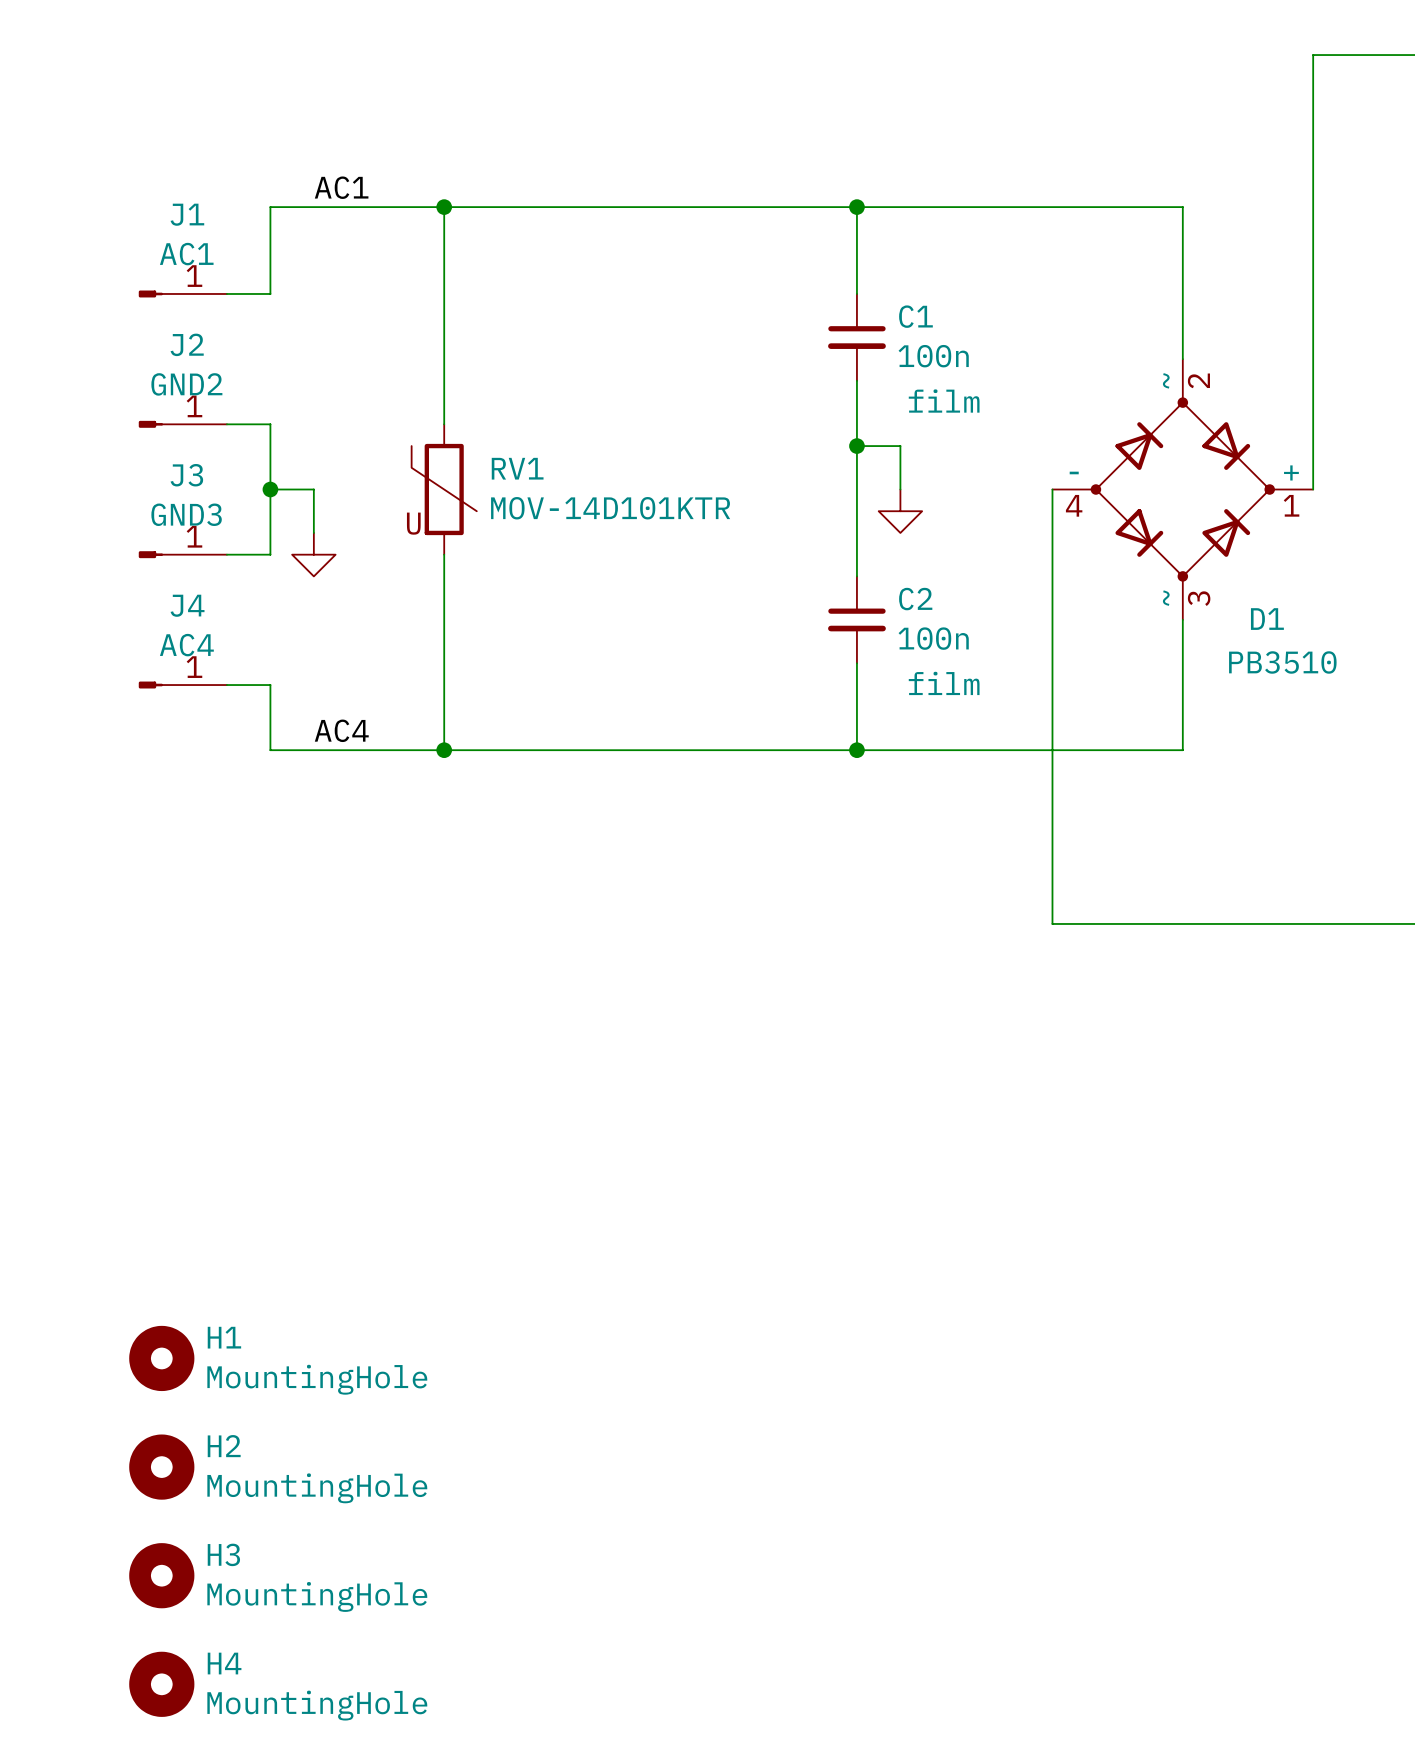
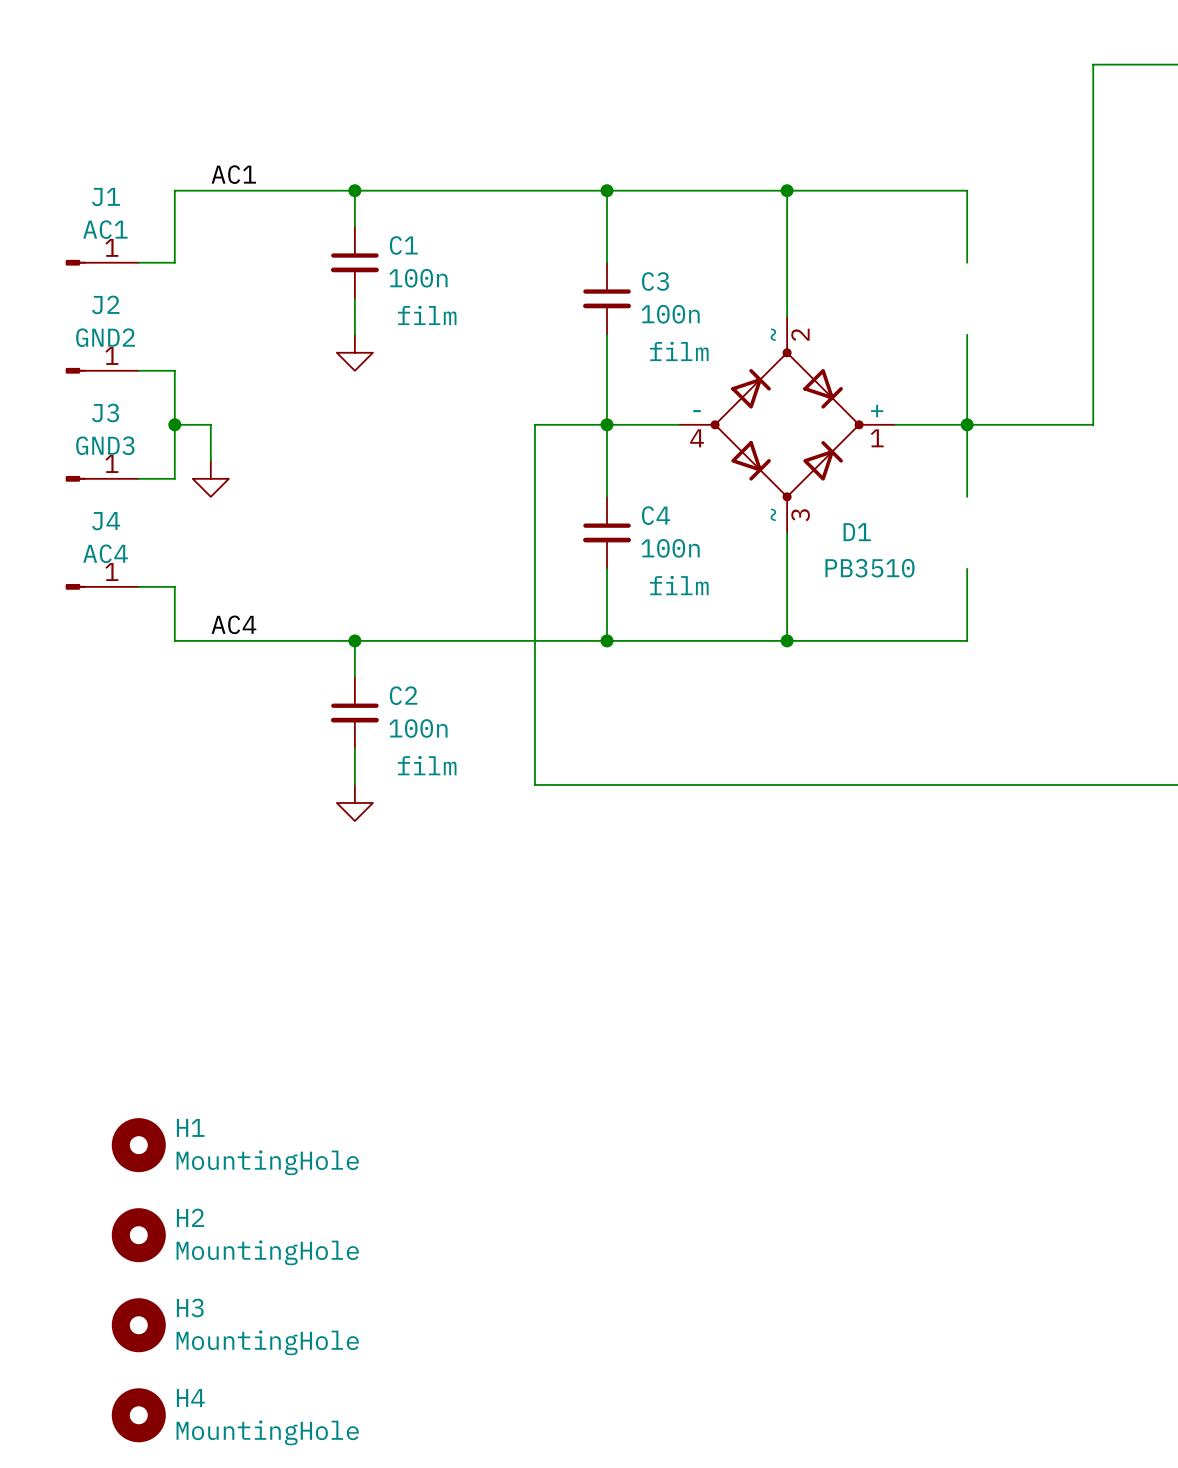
label position: AC1 (341, 187) -> AC1 (233, 174)
wire: (270, 207) (270, 293) (226, 293) -> (228, 190) (174, 190) (174, 262) (138, 262)
wire: none -> (354, 190) (354, 226)
wire: (444, 207) (444, 424) -> none
junction position: (444, 207) -> (354, 190)
junction: none -> (607, 190)
wire: (856, 207) (856, 293) -> (607, 190) (607, 262)
junction: (856, 207) -> none
wire: none -> (787, 190) (787, 316)
junction: none -> (787, 190)
wire: (1161, 207) (1182, 207) (1182, 359) -> (967, 190) (967, 262)
J1 position: (182, 293) -> (102, 262)
wire: none -> (354, 298) (354, 334)
C3: none -> 100n (607, 298)
C1 position: (856, 337) -> (354, 262)
wire: (856, 380) (856, 576) -> (607, 334) (607, 496)
wire: none -> (967, 334) (967, 496)
power symbol: none -> (354, 352)
J2 position: (182, 424) -> (102, 370)
wire: (226, 424) (270, 424) (270, 554) (226, 554) -> (138, 370) (174, 370) (174, 478) (138, 478)
wire: (856, 446) (900, 446) (900, 489) -> none
junction: (856, 446) -> none
wire: (270, 489) (313, 489) (313, 532) -> (174, 424) (210, 424) (210, 460)
junction position: (270, 489) -> (174, 424)
RV1: MOV-14D101KTR (444, 489) -> none
junction: none -> (607, 424)
wire: (1052, 489) (1052, 923) -> (679, 424) (534, 424) (534, 784) (877, 784)
wire: none -> (895, 424) (1093, 424)
junction: none -> (967, 424)
D1 position: (1182, 489) -> (787, 424)
power symbol: (900, 511) -> none
J3 position: (182, 554) -> (102, 478)
power symbol position: (313, 554) -> (210, 478)
wire: (444, 554) (444, 750) -> none
C4: none -> 100n (607, 532)
C2 position: (856, 619) -> (354, 712)
wire: none -> (787, 532) (787, 640)
wire: (1182, 619) (1182, 750) (1161, 750) -> (967, 568) (967, 640)
wire: (856, 663) (856, 750) -> (607, 568) (607, 640)
J4 position: (182, 685) -> (102, 586)
wire: (226, 685) (270, 685) (270, 750) -> (138, 586) (174, 586) (174, 640) (228, 640)
label position: AC4 (341, 730) -> AC4 (233, 624)
wire: none -> (354, 640) (354, 676)
junction position: (444, 750) -> (354, 640)
junction: none -> (607, 640)
junction: (856, 750) -> none
junction: none -> (787, 640)
wire: none -> (354, 748) (354, 784)
power symbol: none -> (354, 802)

